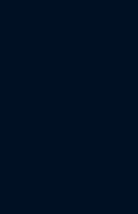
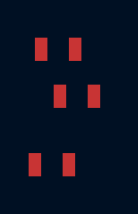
part: none -> (58, 49)
part: none -> (76, 96)
part: none -> (51, 164)

